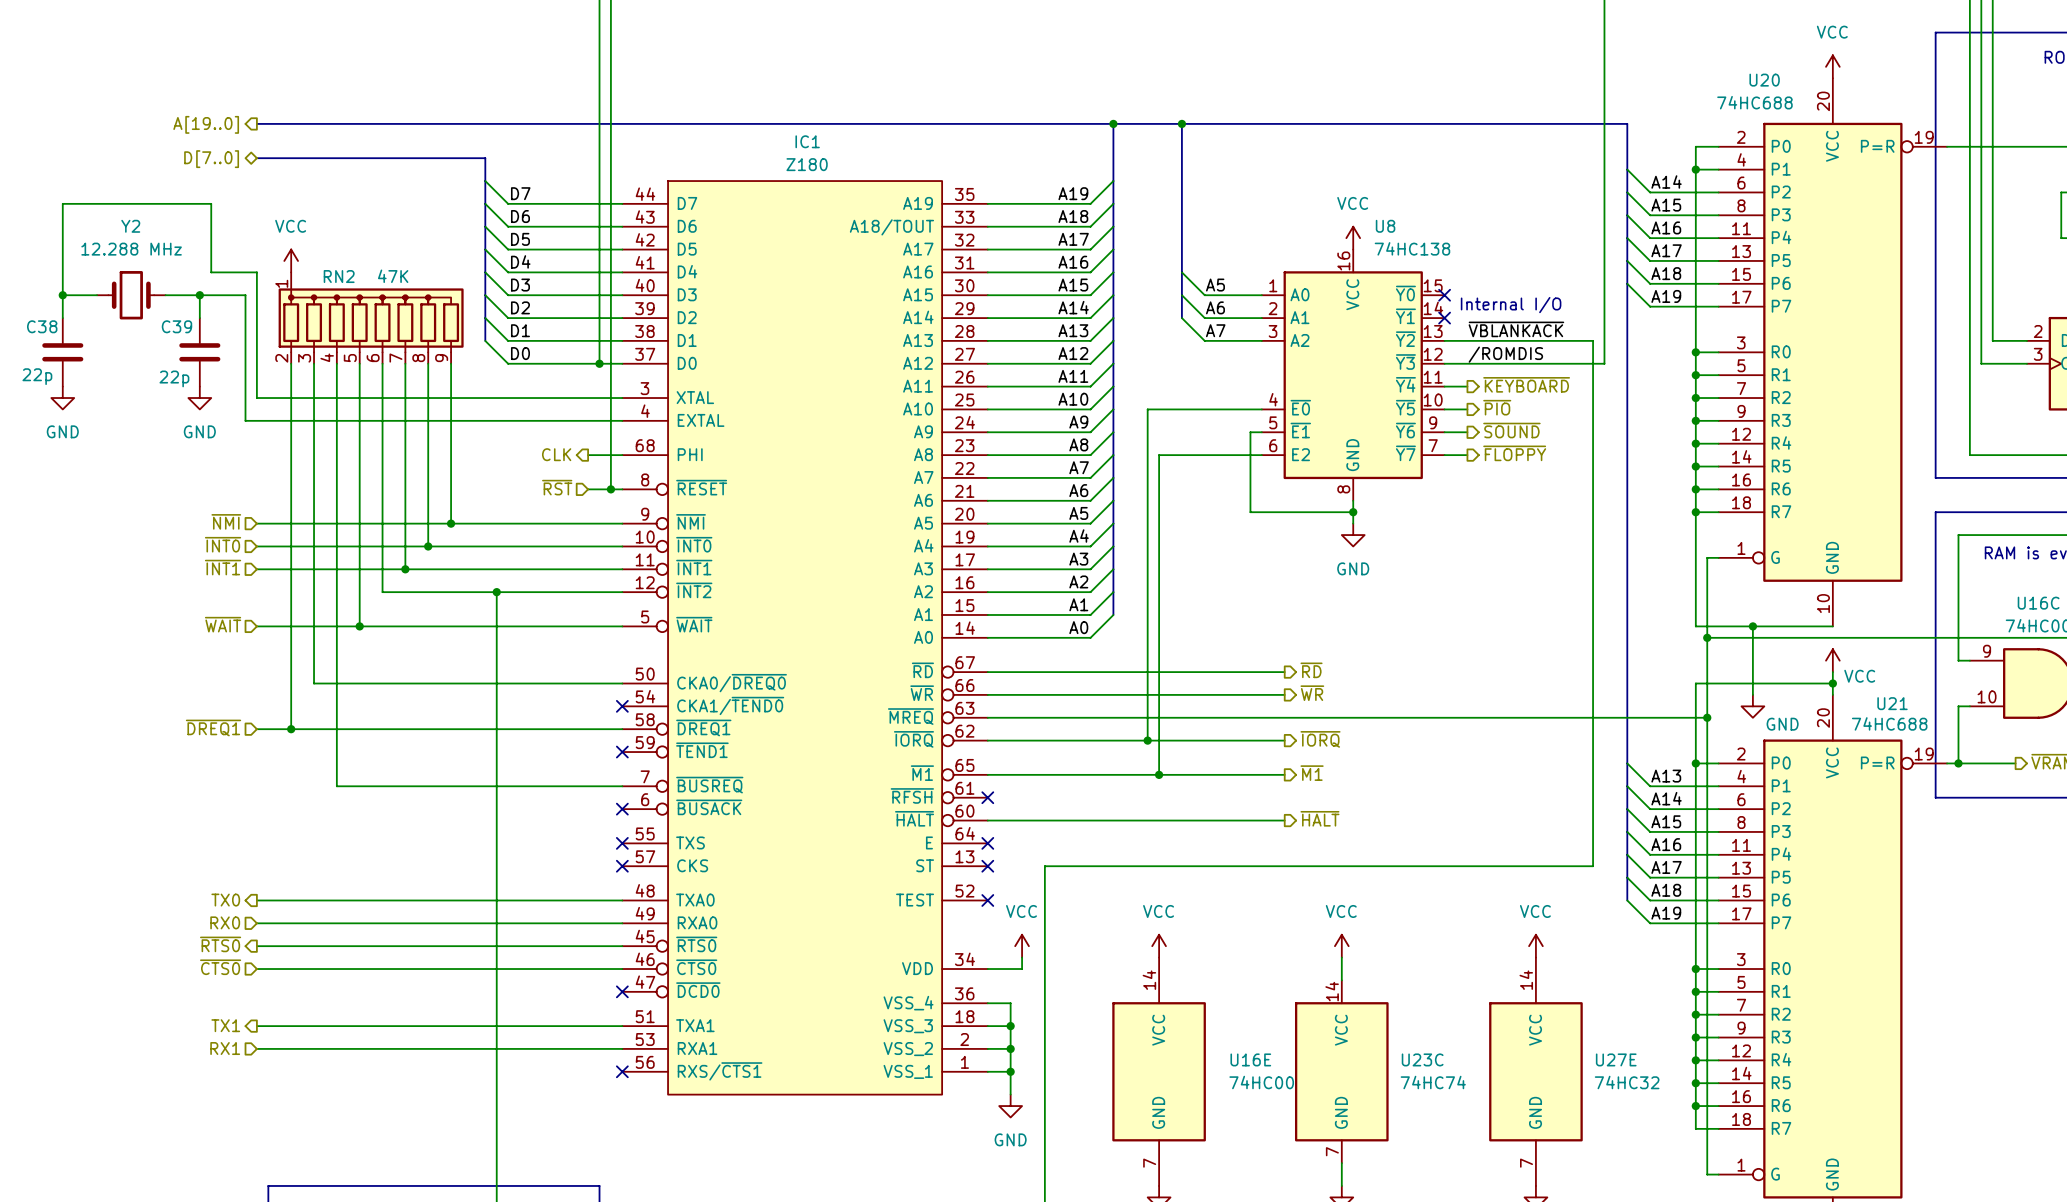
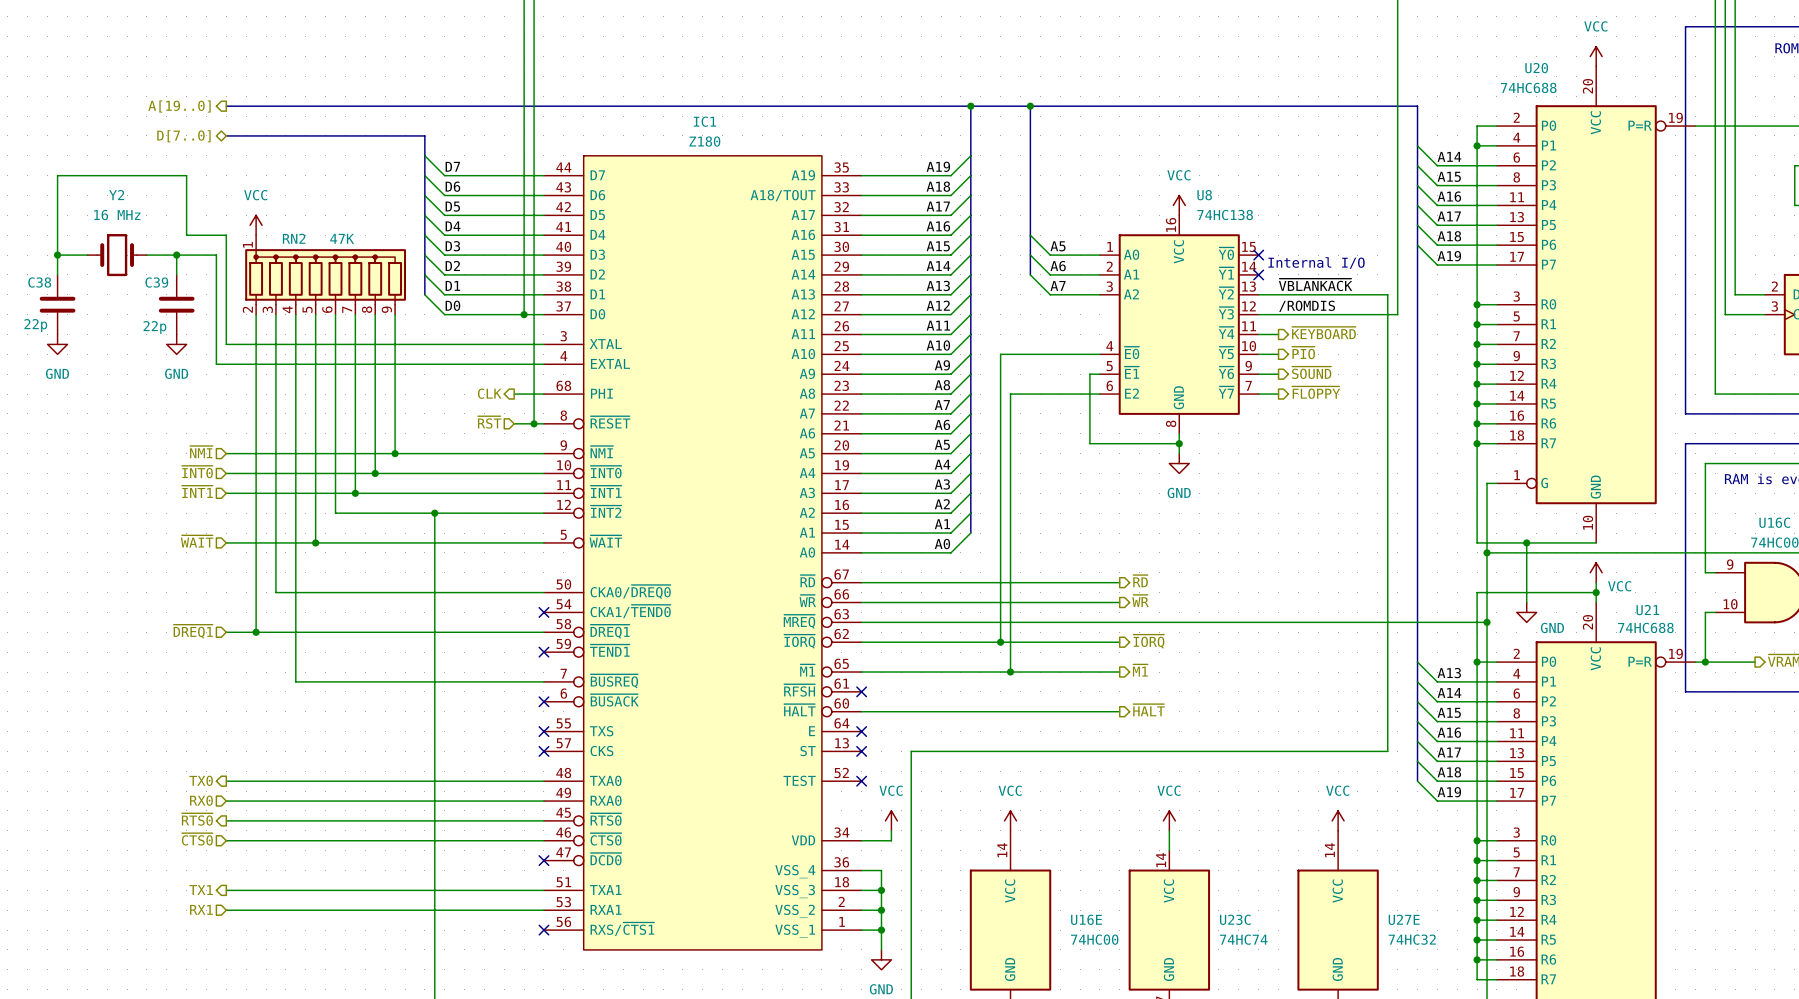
Y2 value: 12.288 MHz (131, 249) -> 16 MHz (117, 215)

